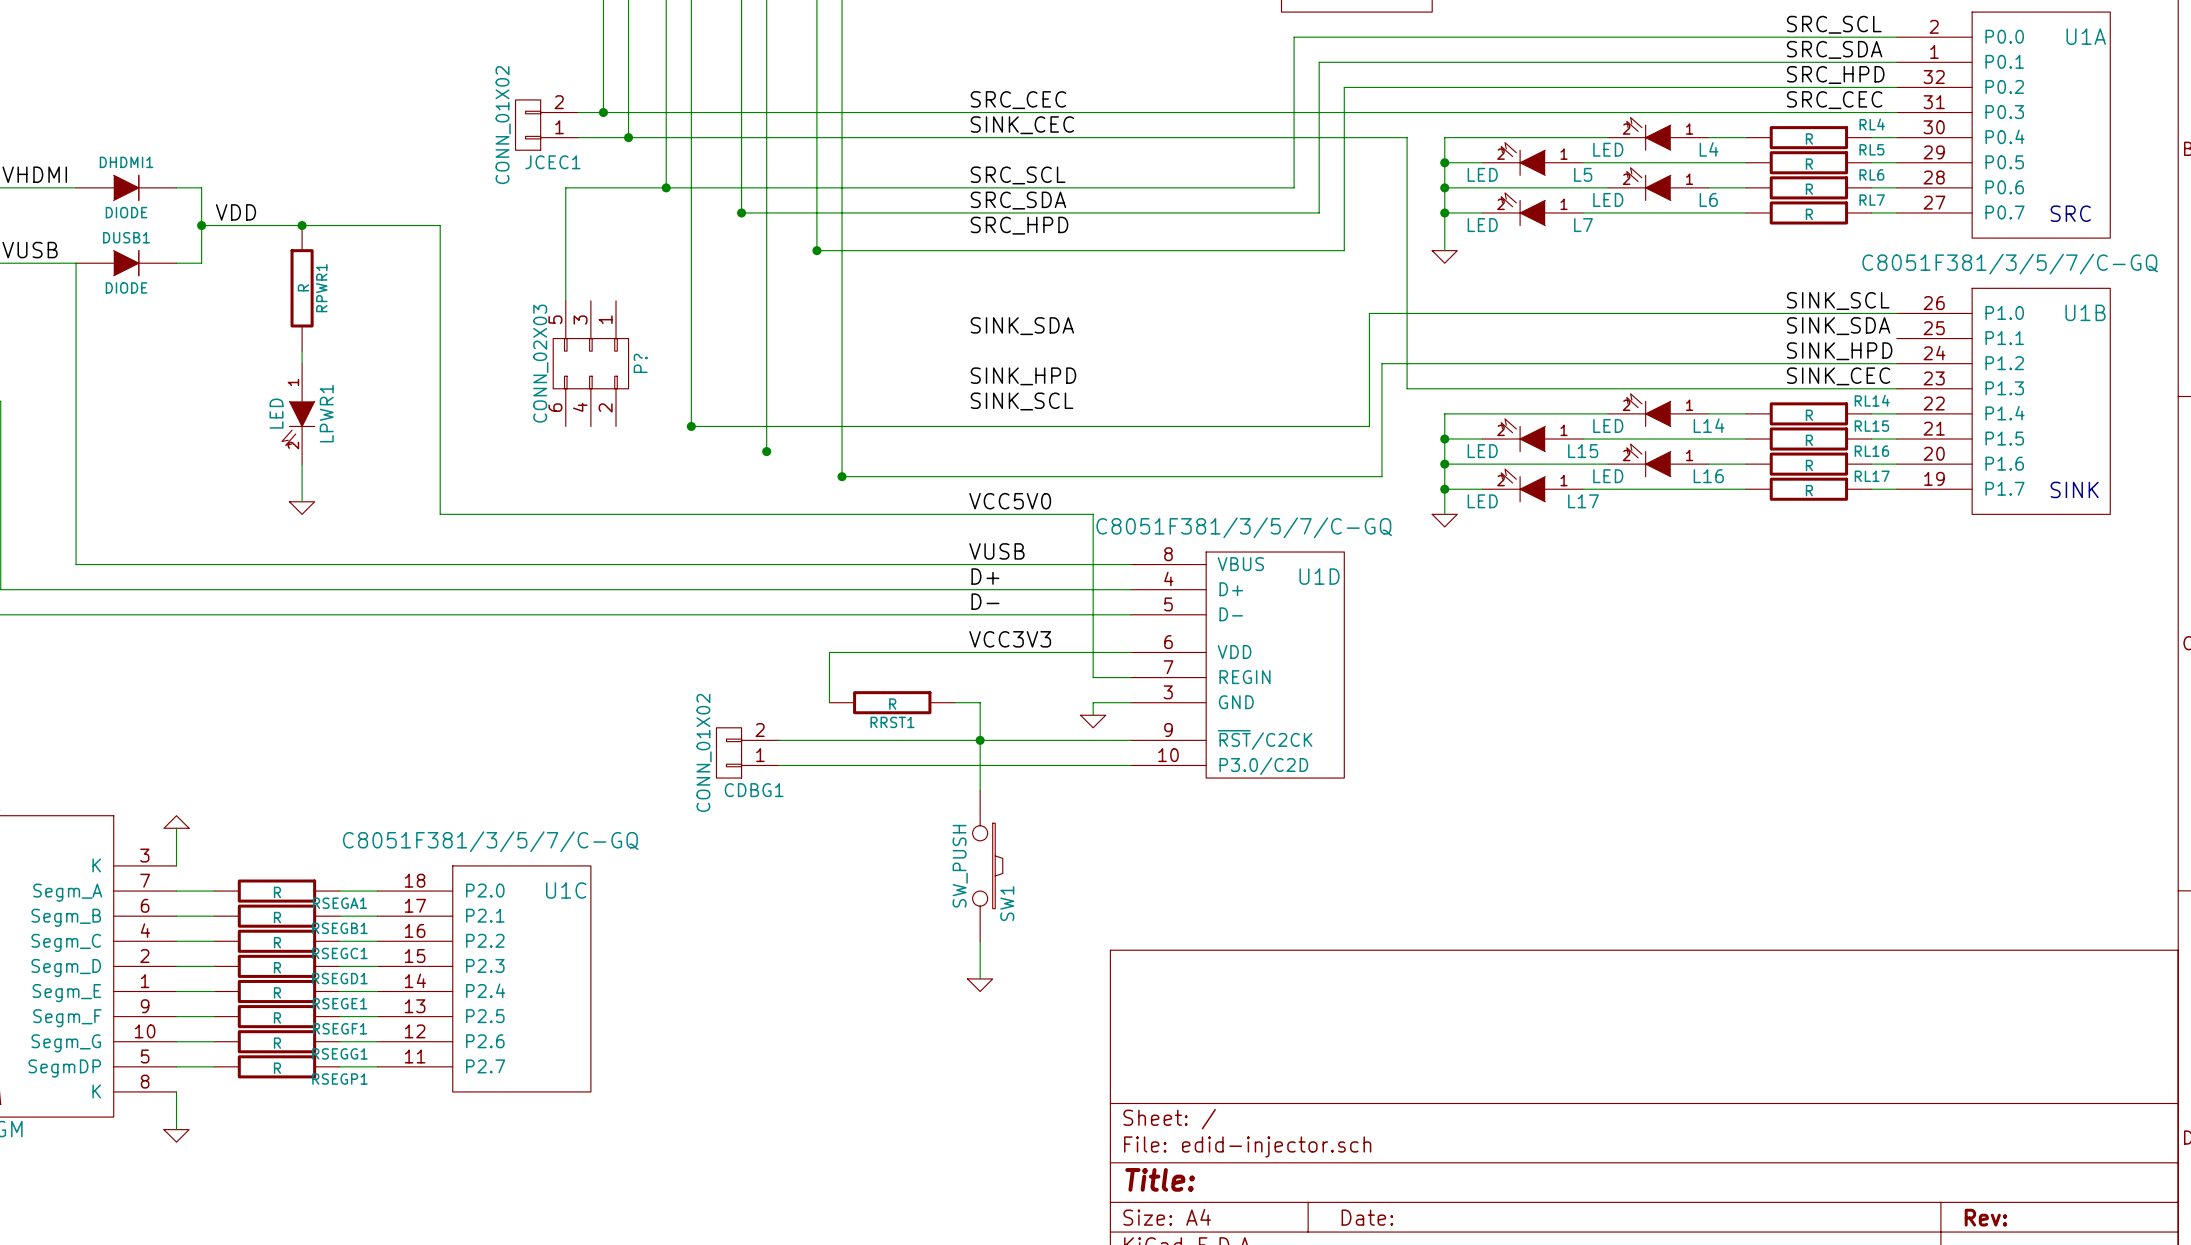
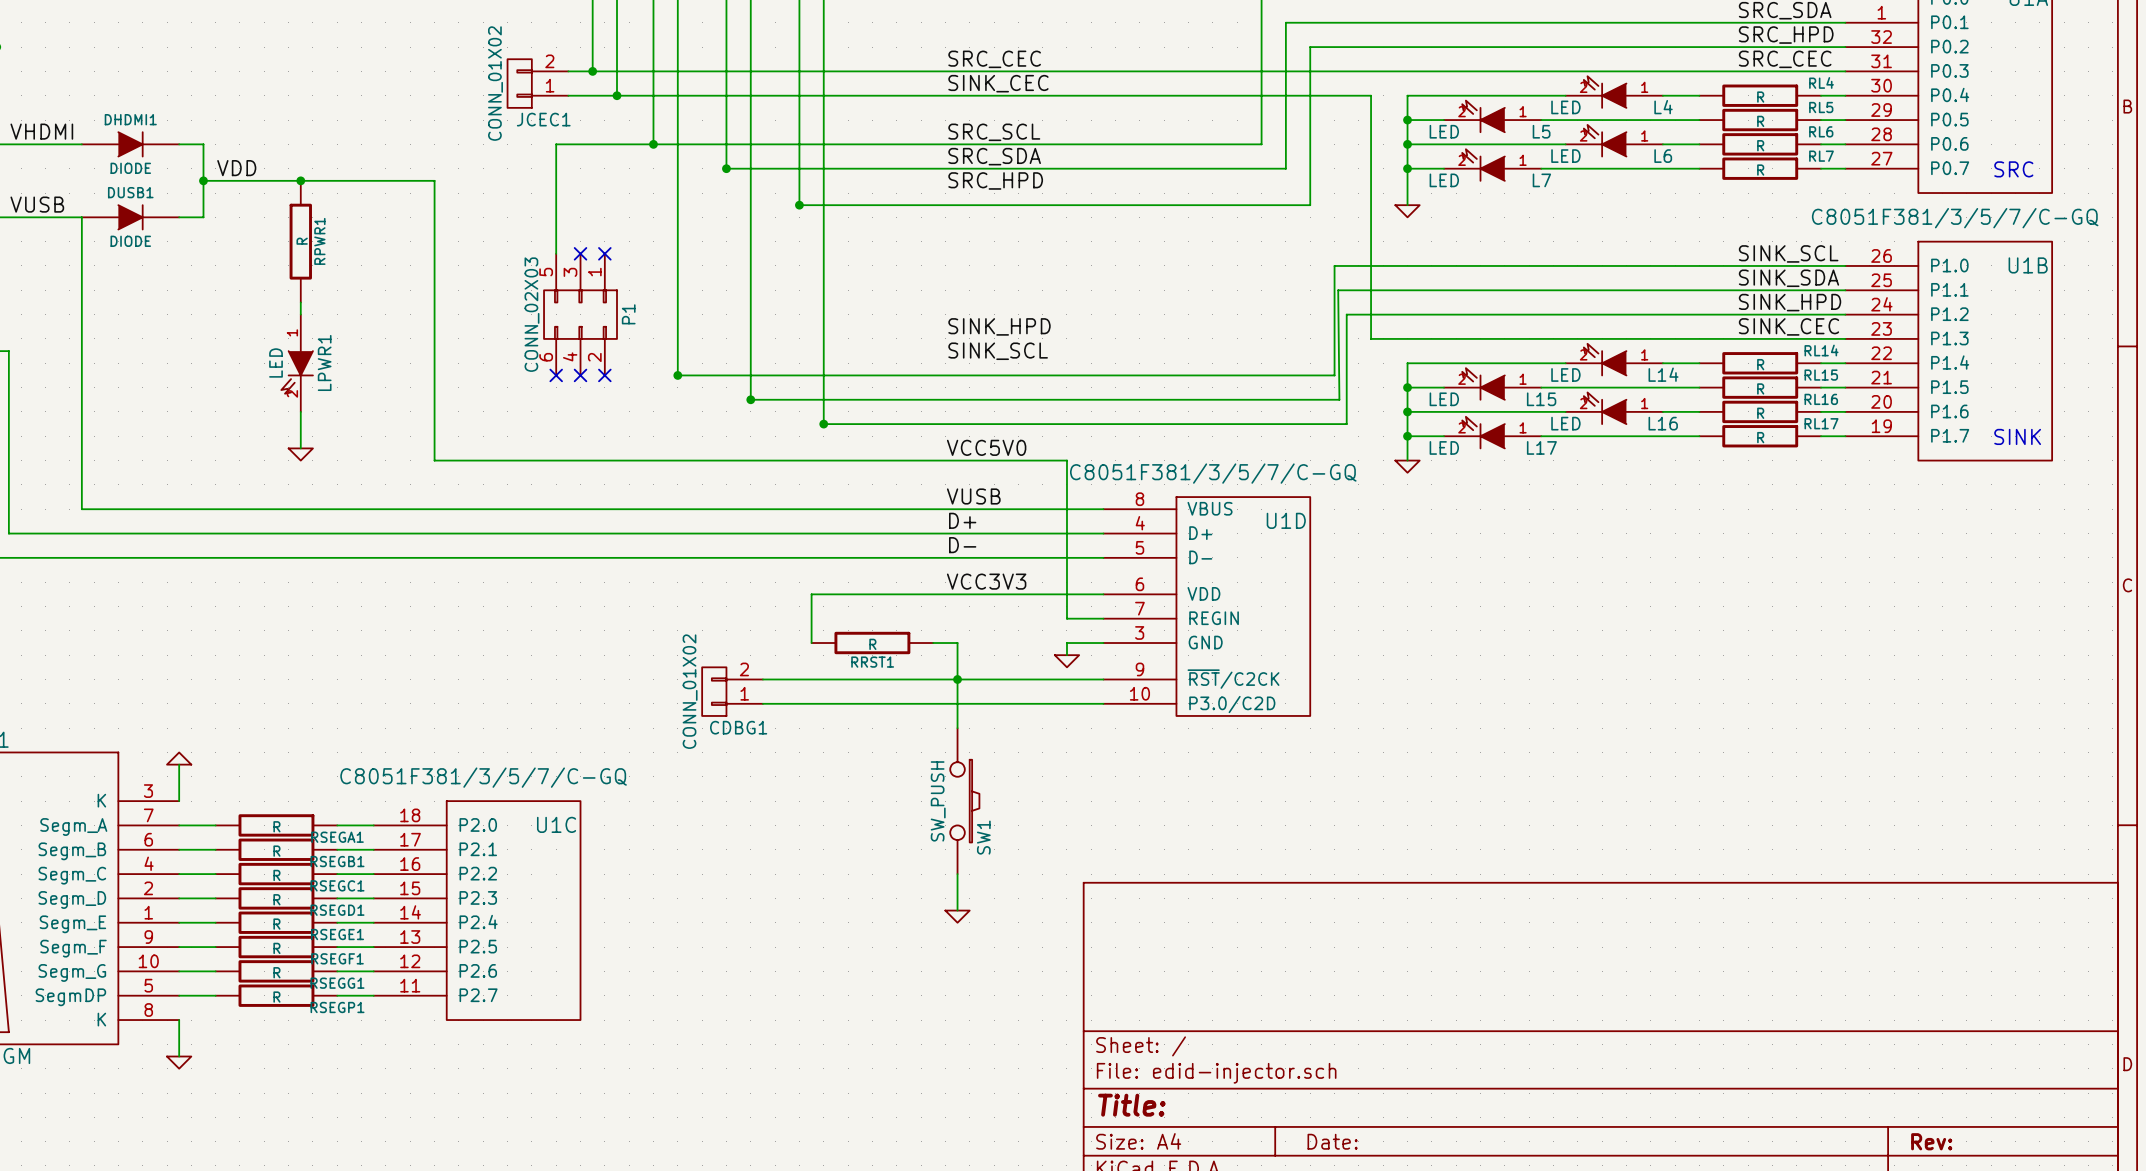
no-connect mark: none -> (580, 253)
no-connect mark: none -> (604, 253)
label: SINK_SDA (1022, 326) -> none
wire: none -> (1845, 290) (1338, 290) (1339, 399) (750, 399)
P? name: P? (640, 363) -> P1 (628, 314)
no-connect mark: none -> (556, 375)
no-connect mark: none -> (580, 375)
no-connect mark: none -> (604, 375)

